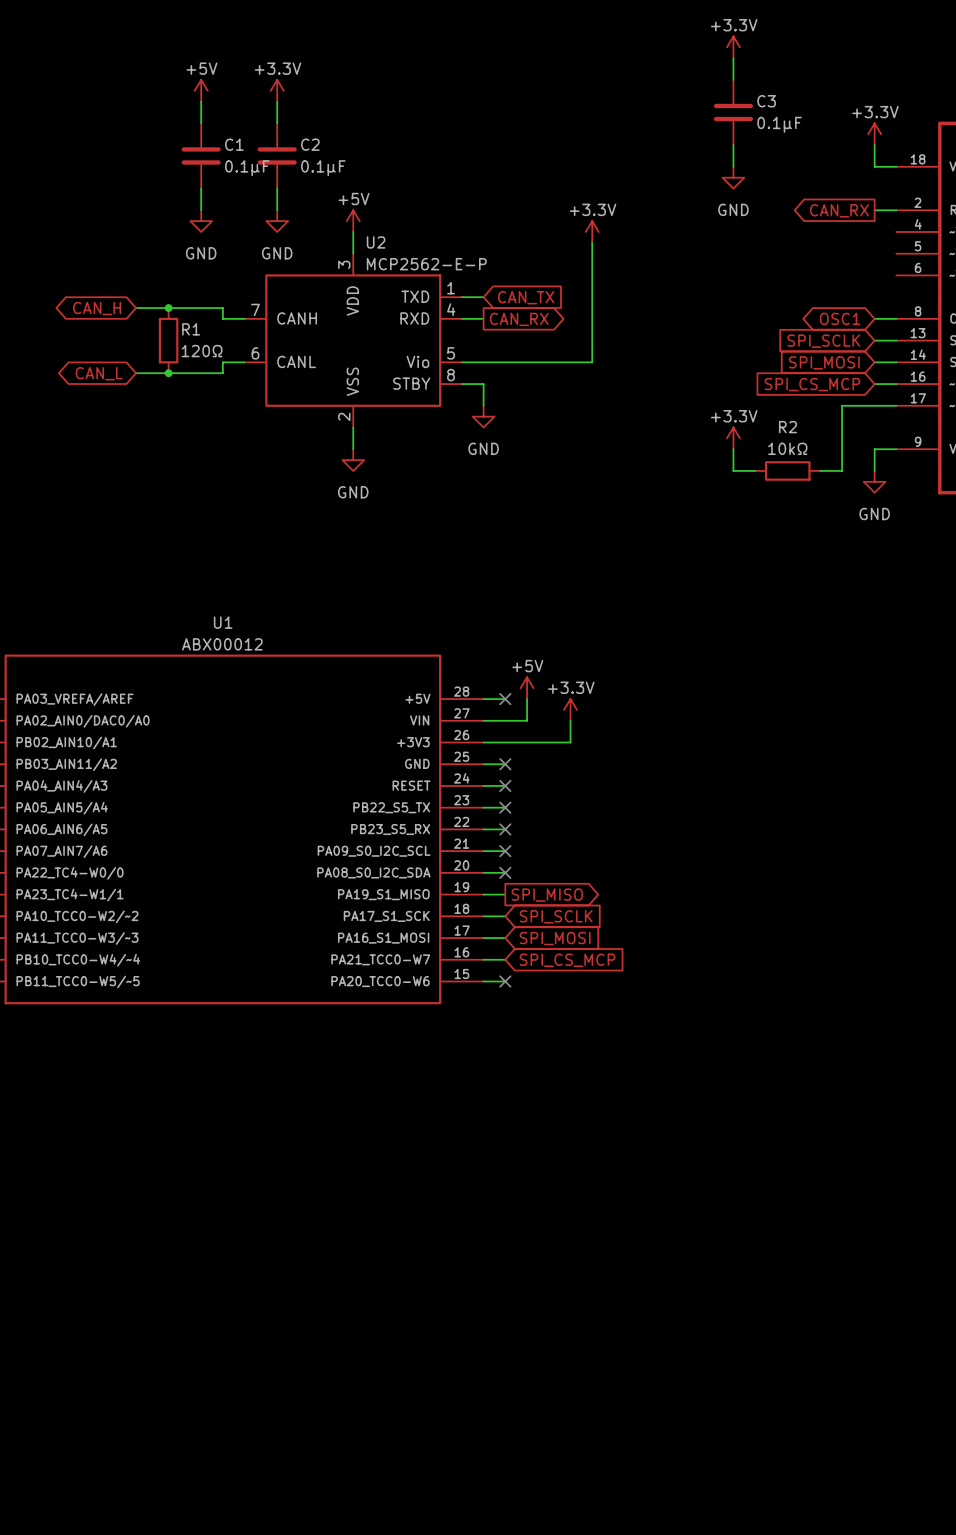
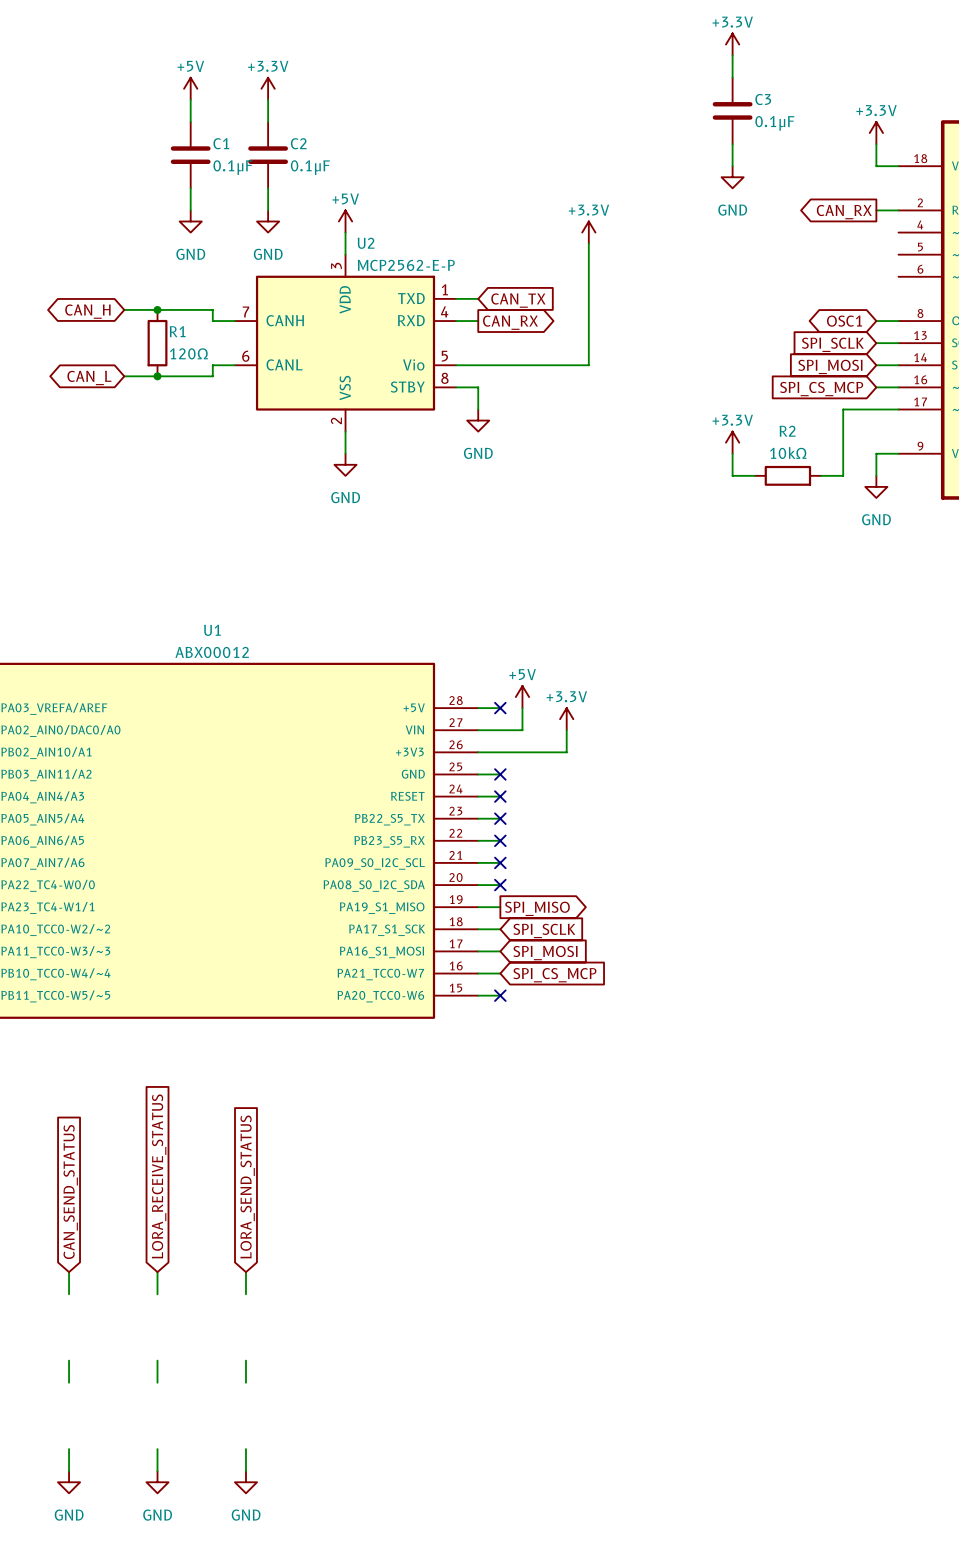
global label: none -> LORA_RECEIVE_STATUS (159, 1176)
global label: none -> LORA_SEND_STATUS (247, 1187)
global label: none -> CAN_SEND_STATUS (70, 1192)
wire: none -> (69, 1272) (69, 1294)
wire: none -> (157, 1272) (157, 1294)
wire: none -> (245, 1272) (245, 1294)
wire: none -> (69, 1360) (69, 1382)
wire: none -> (157, 1360) (157, 1382)
wire: none -> (245, 1360) (245, 1382)
wire: none -> (69, 1449) (69, 1471)
wire: none -> (157, 1449) (157, 1471)
wire: none -> (245, 1449) (245, 1471)
power symbol: none -> GND (69, 1482)
power symbol: none -> GND (157, 1482)
power symbol: none -> GND (245, 1482)

